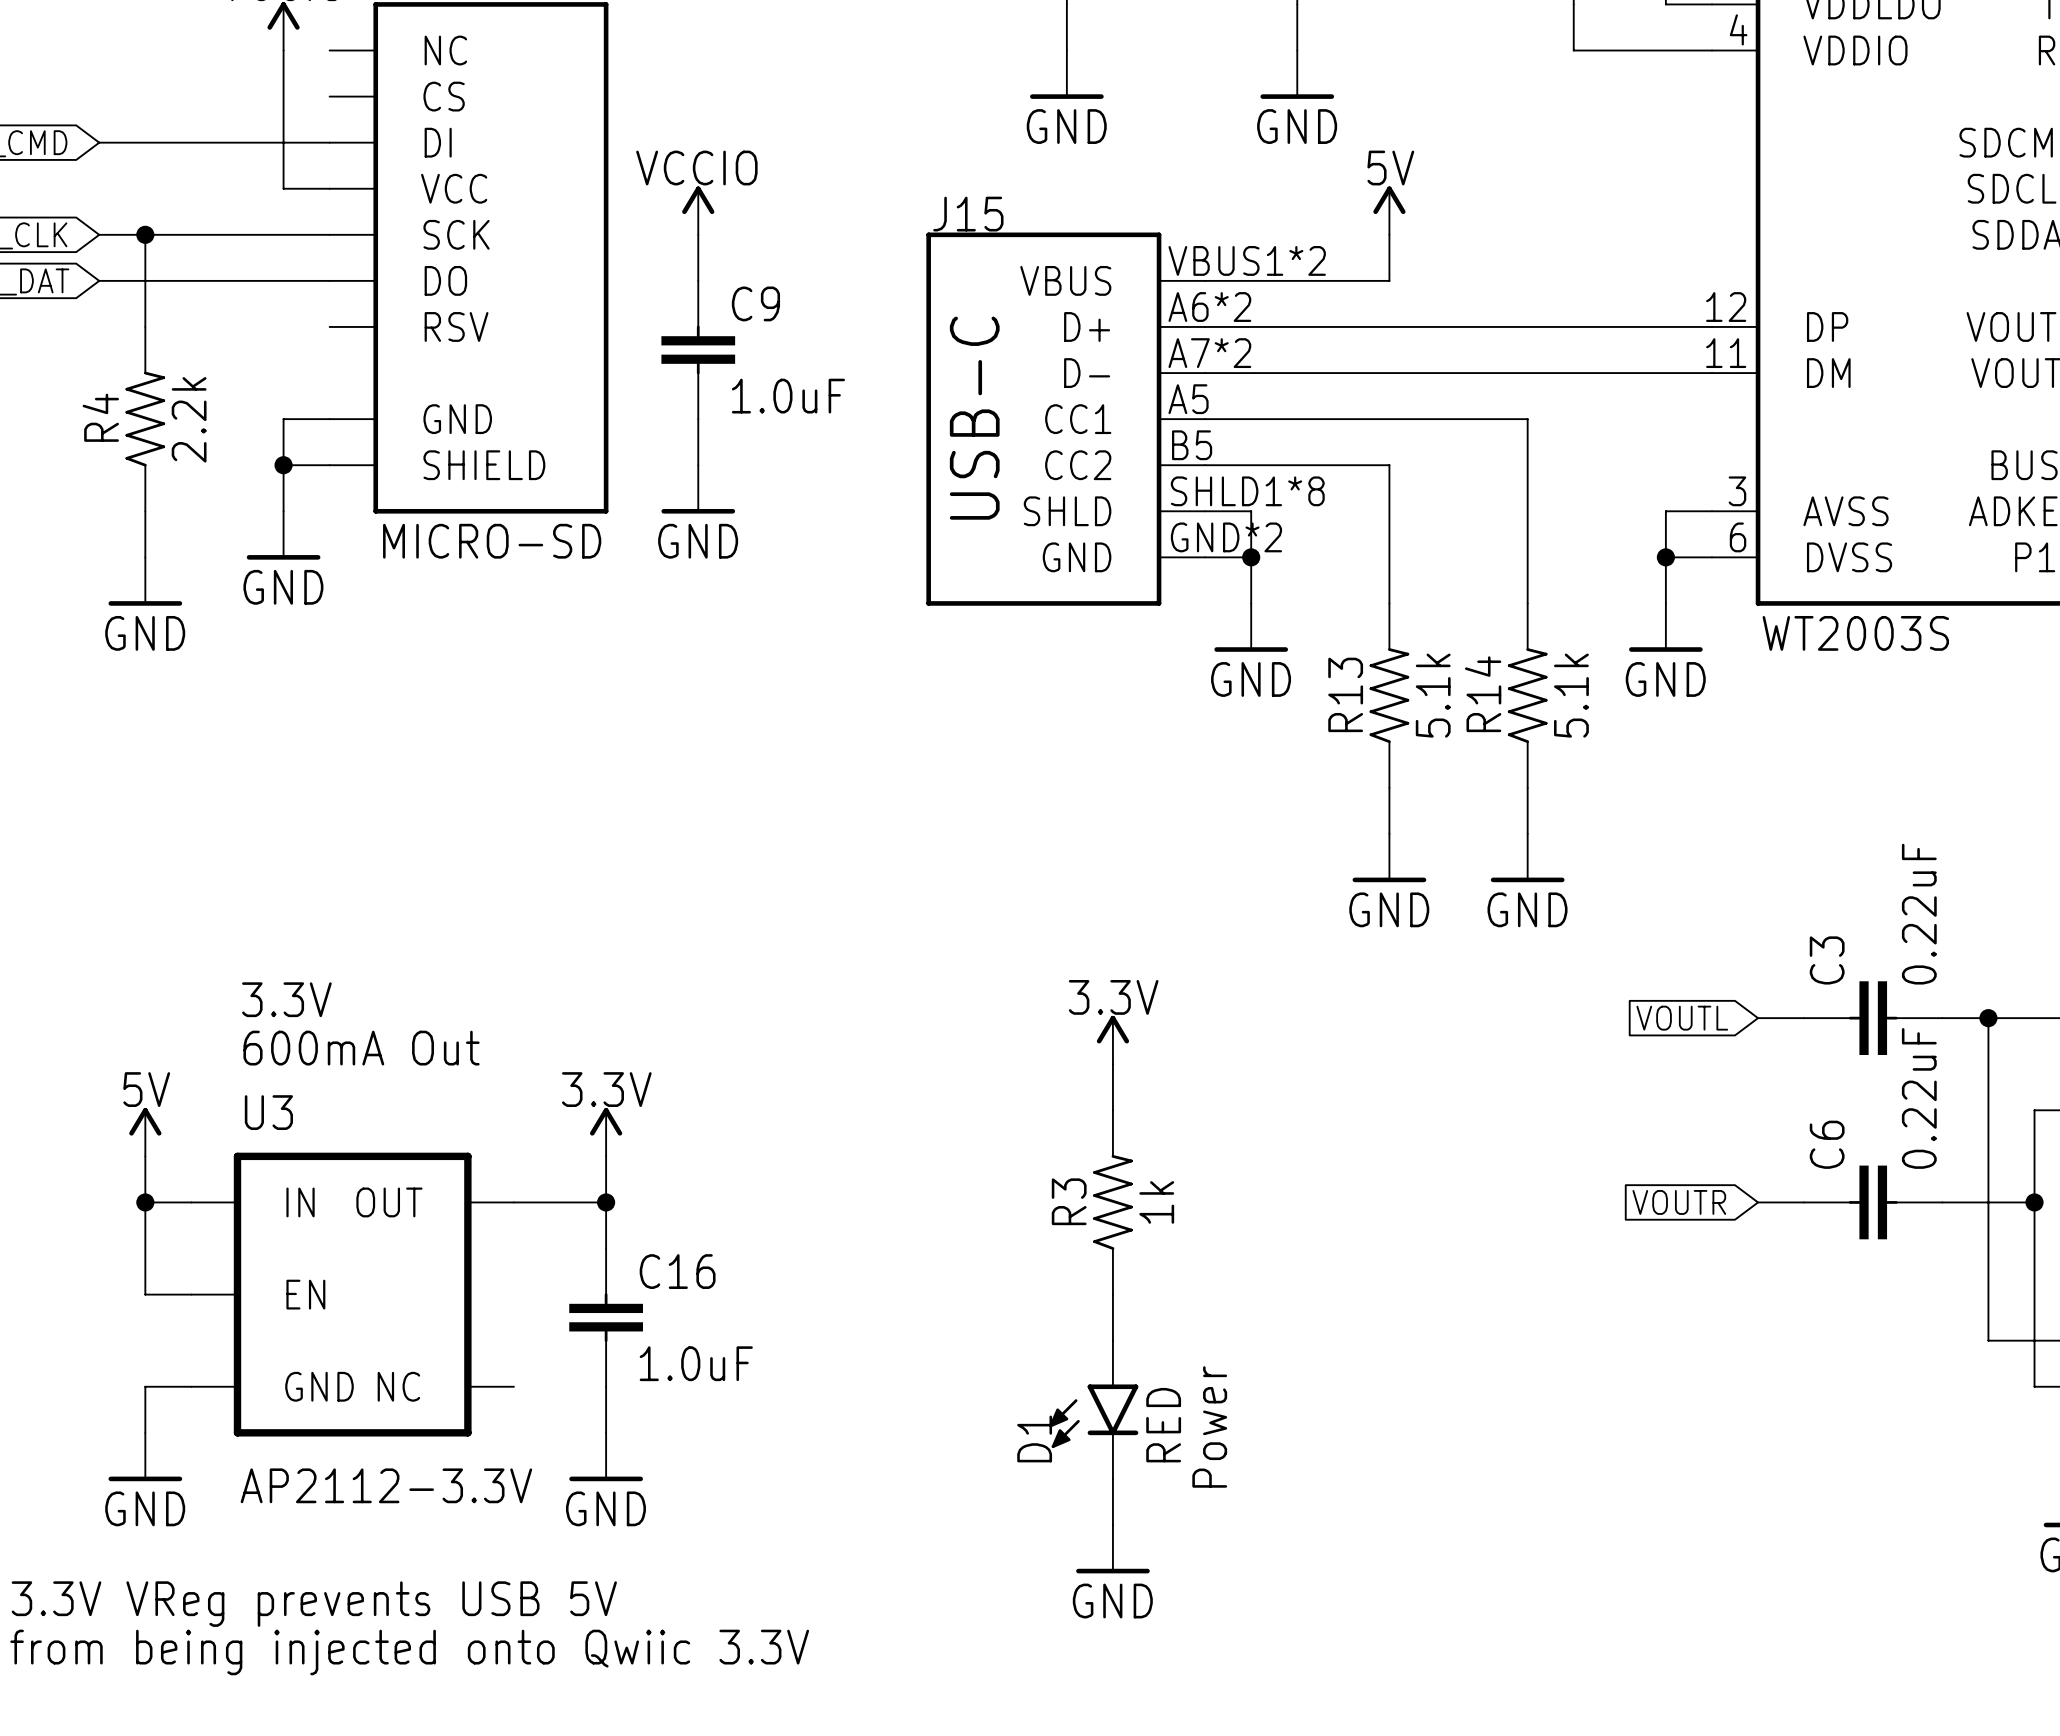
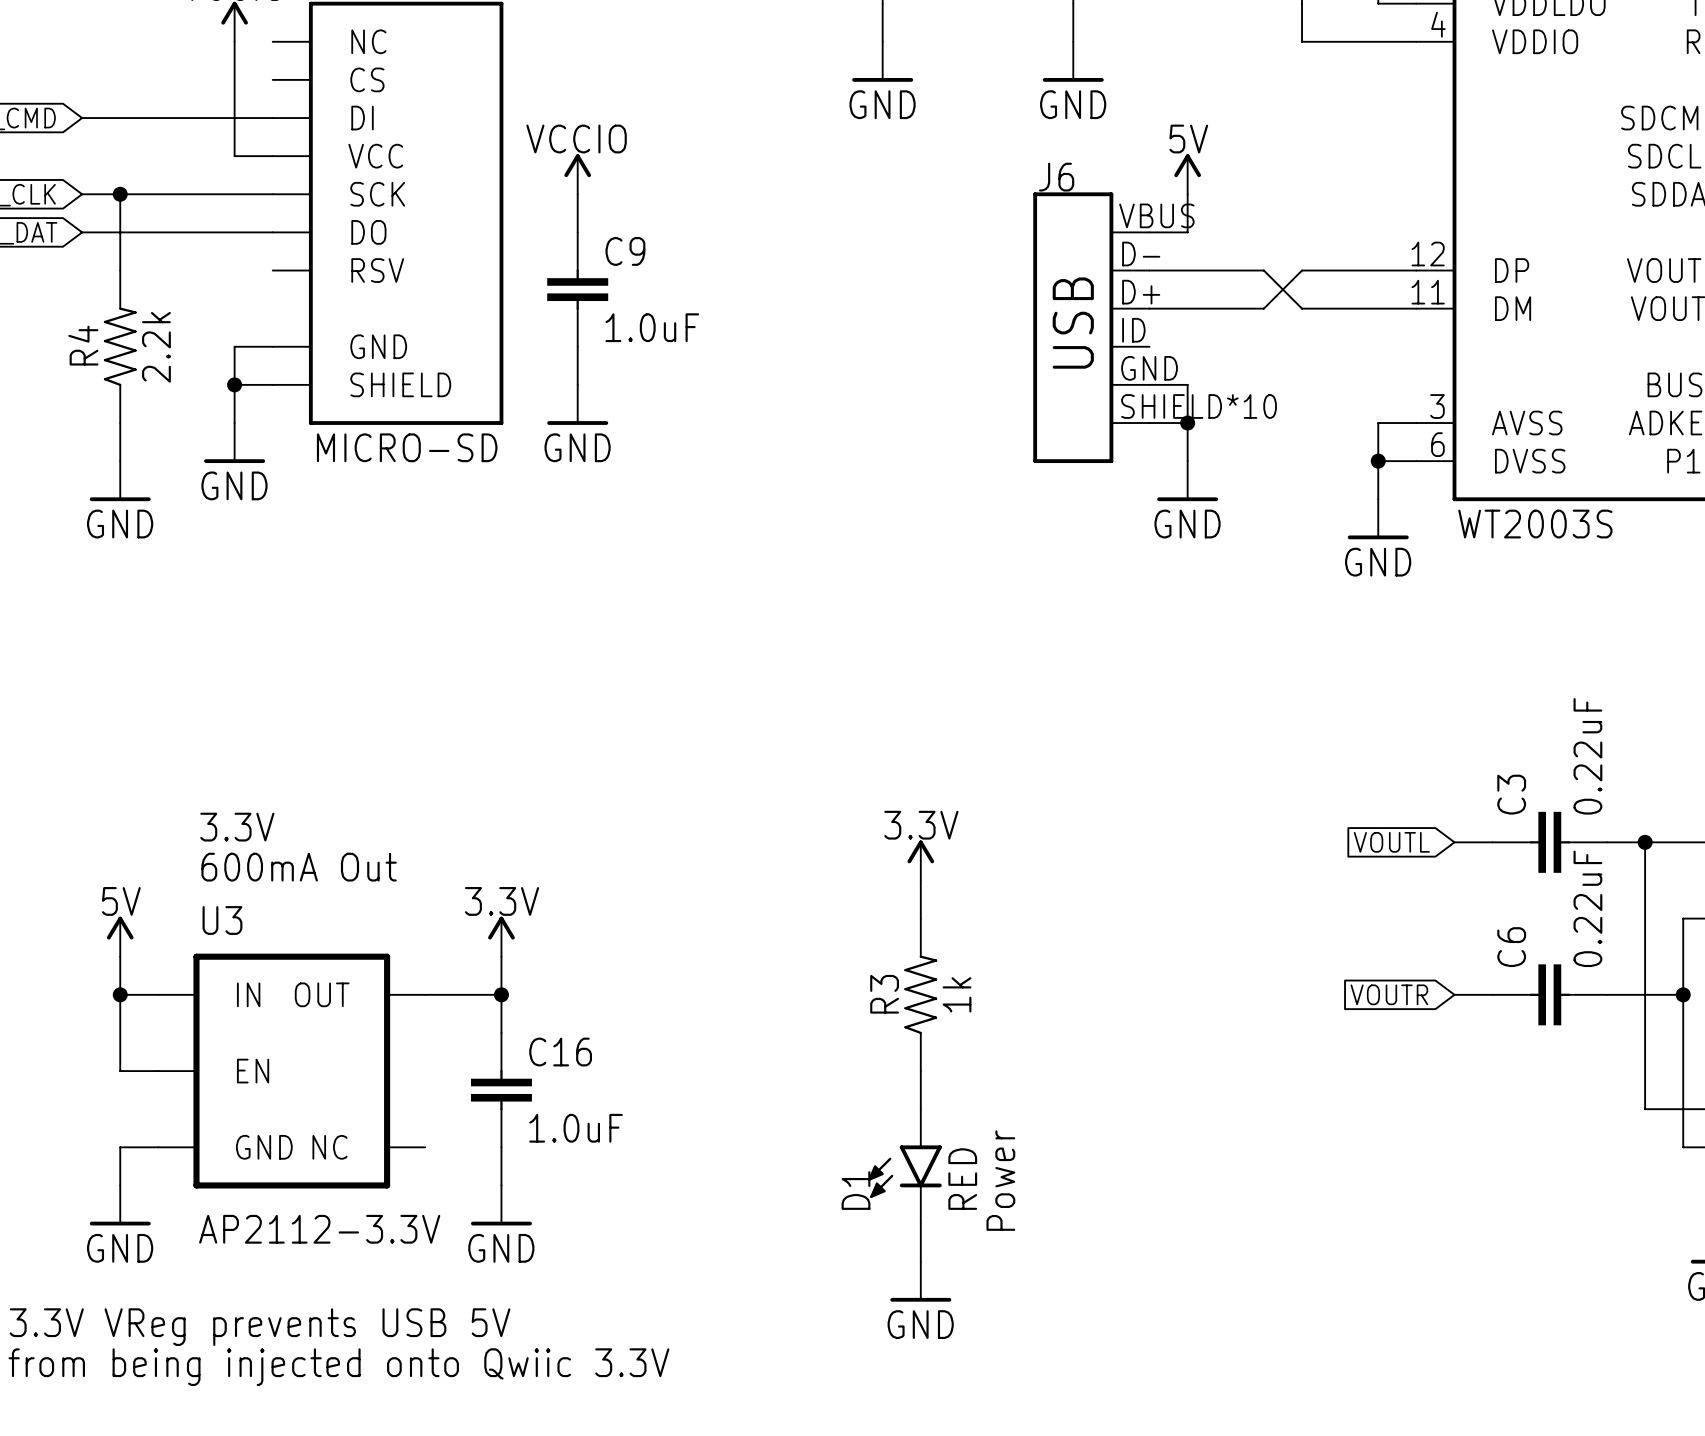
power symbol position: 5V (1389, 210) -> 5V (1187, 174)
wire: (1389, 234) (1389, 280) (1205, 280) -> none
wire: none -> (1187, 194) (1187, 232) (1149, 232)
wire: (1205, 326) (1389, 326) -> none
wire: (1527, 326) (1573, 326) -> (1263, 270) (1302, 308)
wire: (1205, 373) (1389, 373) -> none
wire: (1527, 373) (1573, 373) -> (1263, 308) (1302, 270)
J6: none -> (1091, 327)
J15: (1065, 419) -> none
wire: (1205, 419) (1527, 419) (1527, 603) -> none
wire: (1205, 465) (1389, 465) (1389, 603) -> none
wire: (1205, 511) (1251, 511) (1251, 603) -> (1149, 384) (1187, 384) (1187, 461)
junction: none -> (1187, 423)
wire: (1205, 557) (1251, 557) -> (1149, 423) (1187, 423)
junction: (1251, 557) -> none
power symbol: none -> GND (1187, 481)
power symbol: GND (1251, 627) -> none
R13: 5.1k (1389, 695) -> none
R14: 5.1k (1527, 695) -> none
wire: (1389, 787) (1389, 833) -> none
wire: (1527, 787) (1527, 833) -> none
power symbol: GND (1389, 858) -> none
power symbol: GND (1527, 858) -> none

